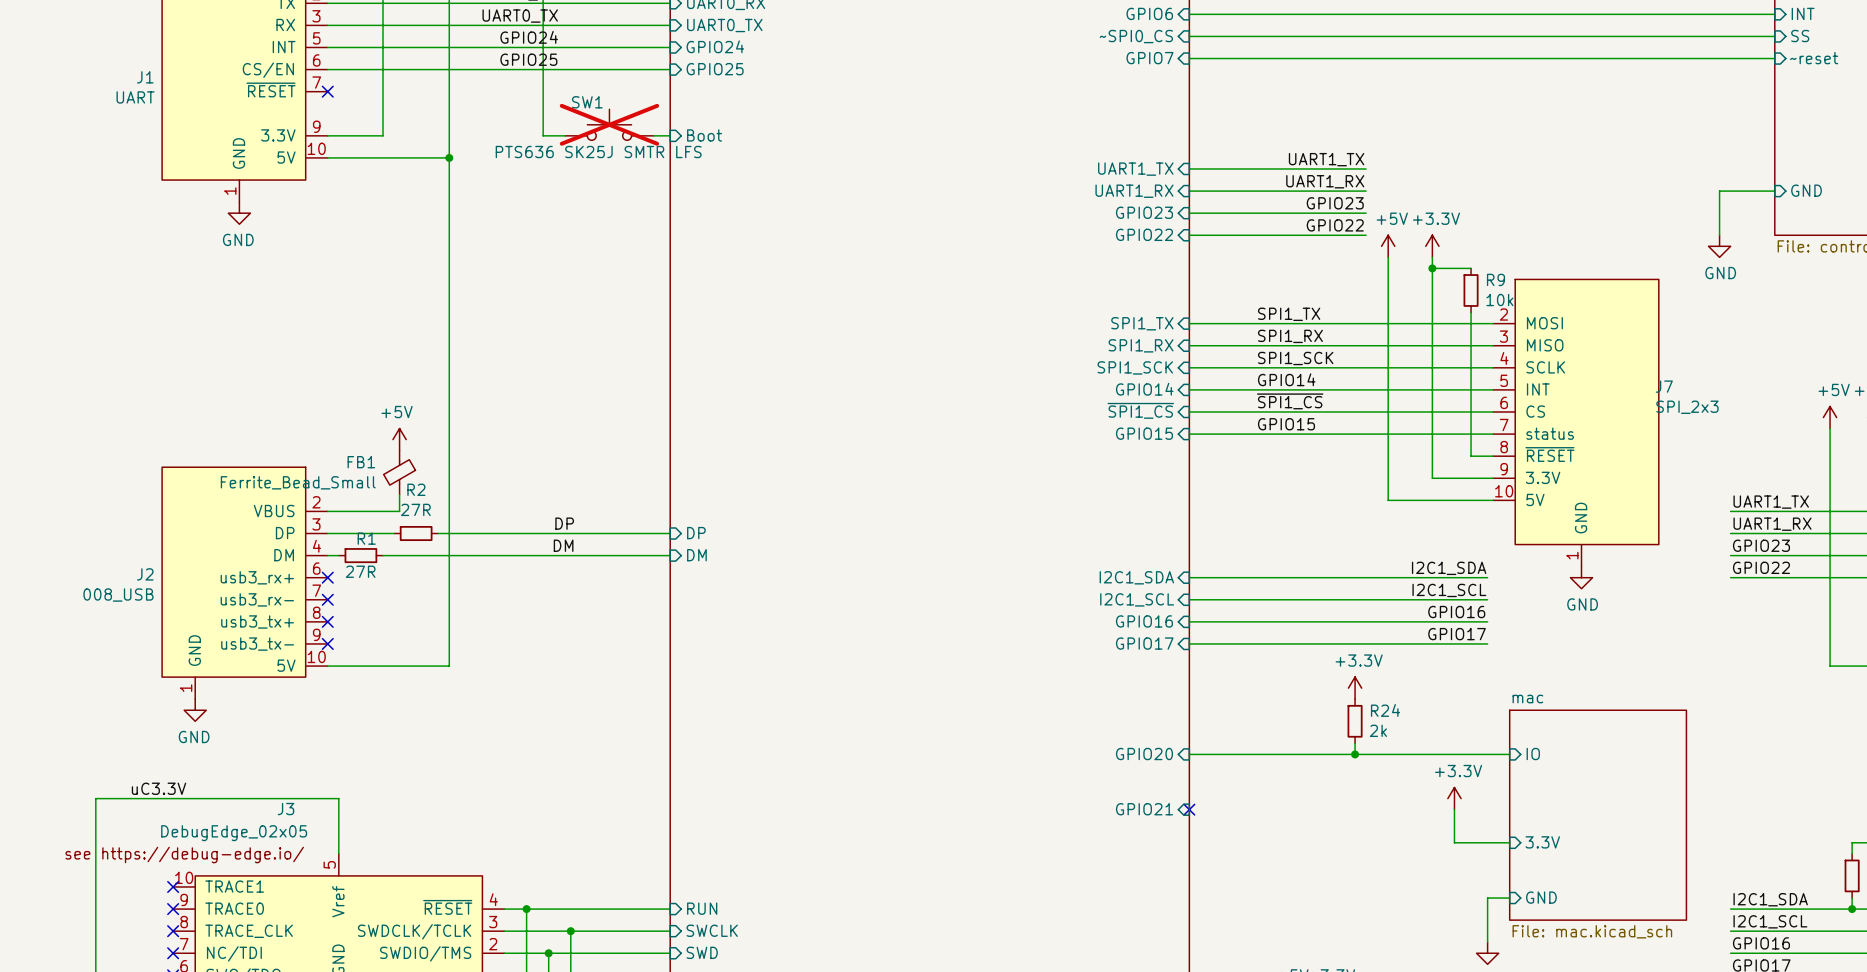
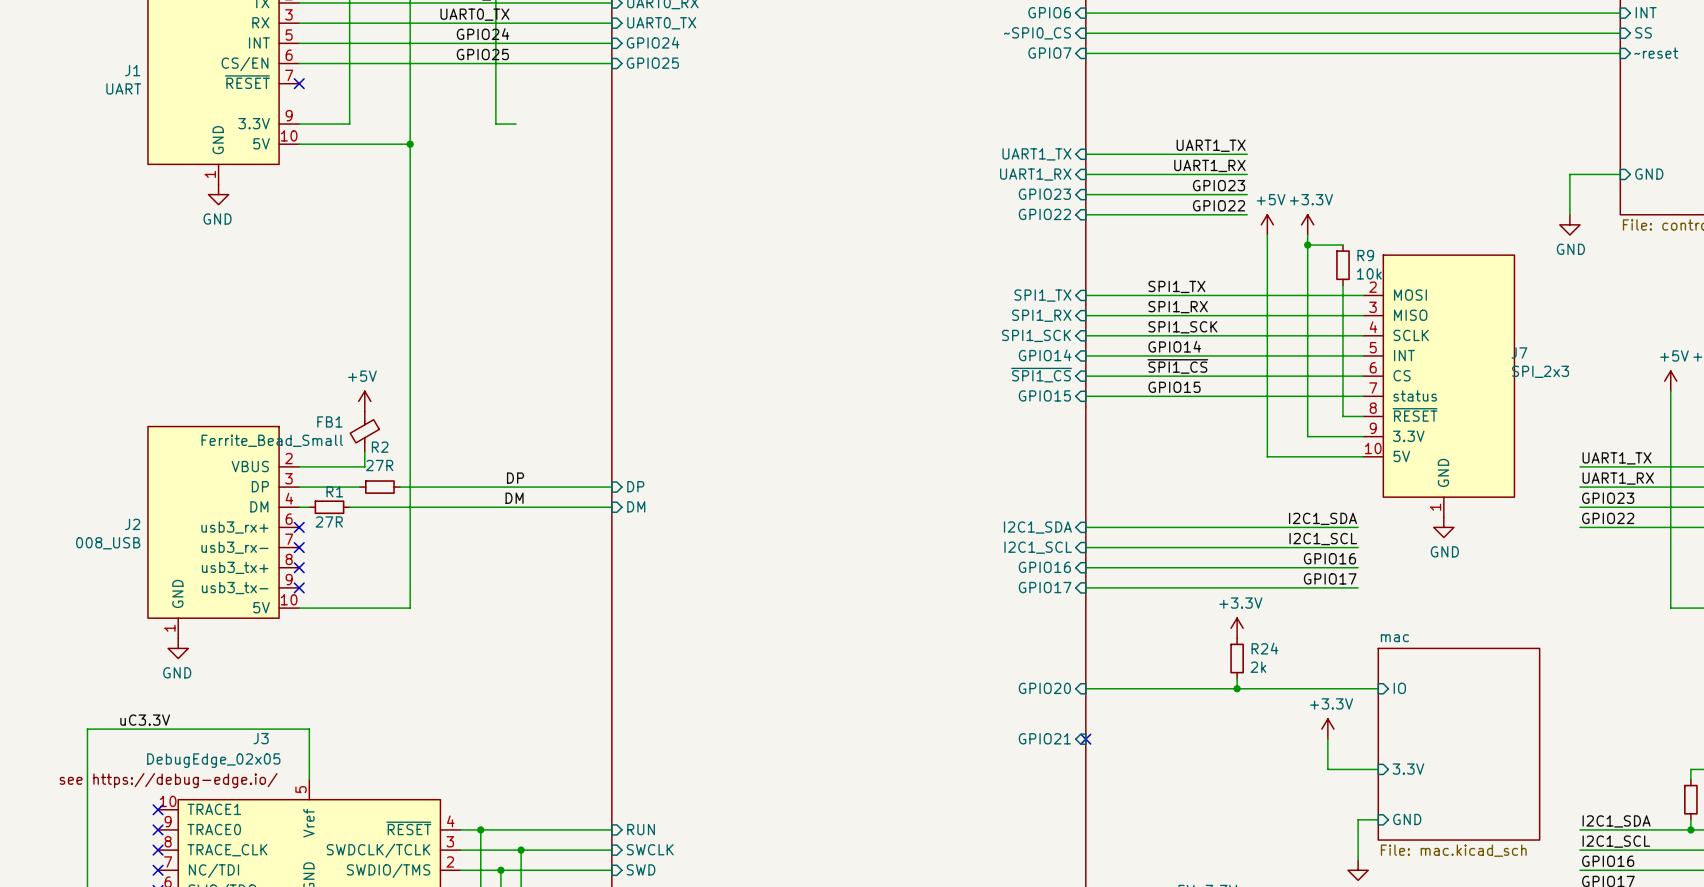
SW1: PTS636 SK25J SMTR LFS (609, 124) -> none
wire: (653, 135) (670, 135) -> none
sheet pin: Boot (704, 135) -> none

